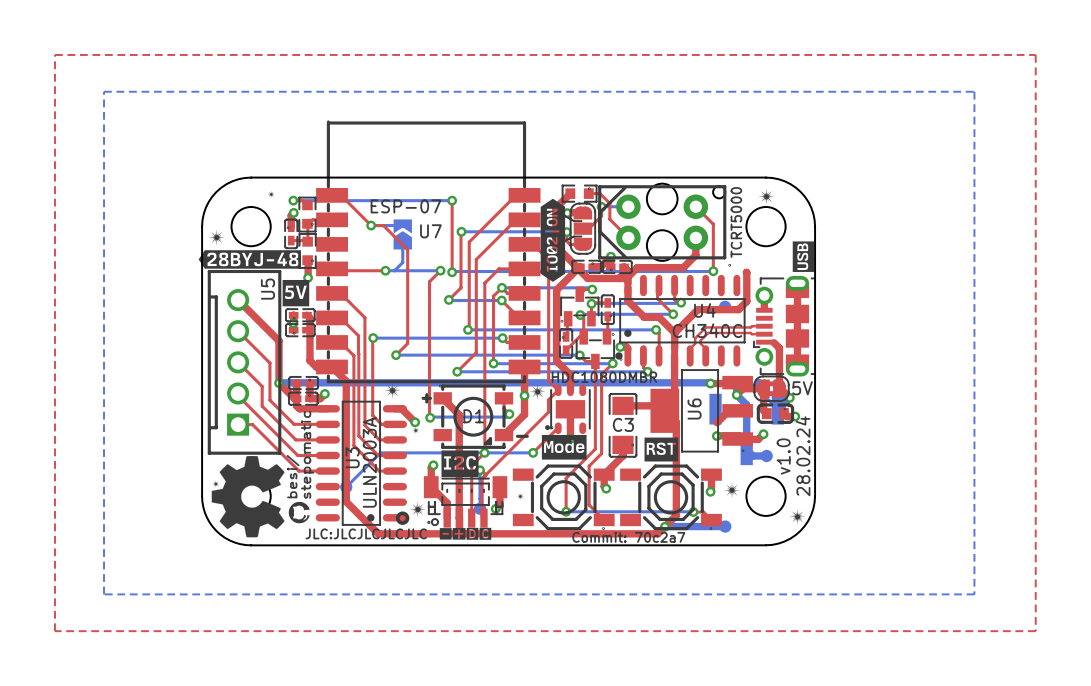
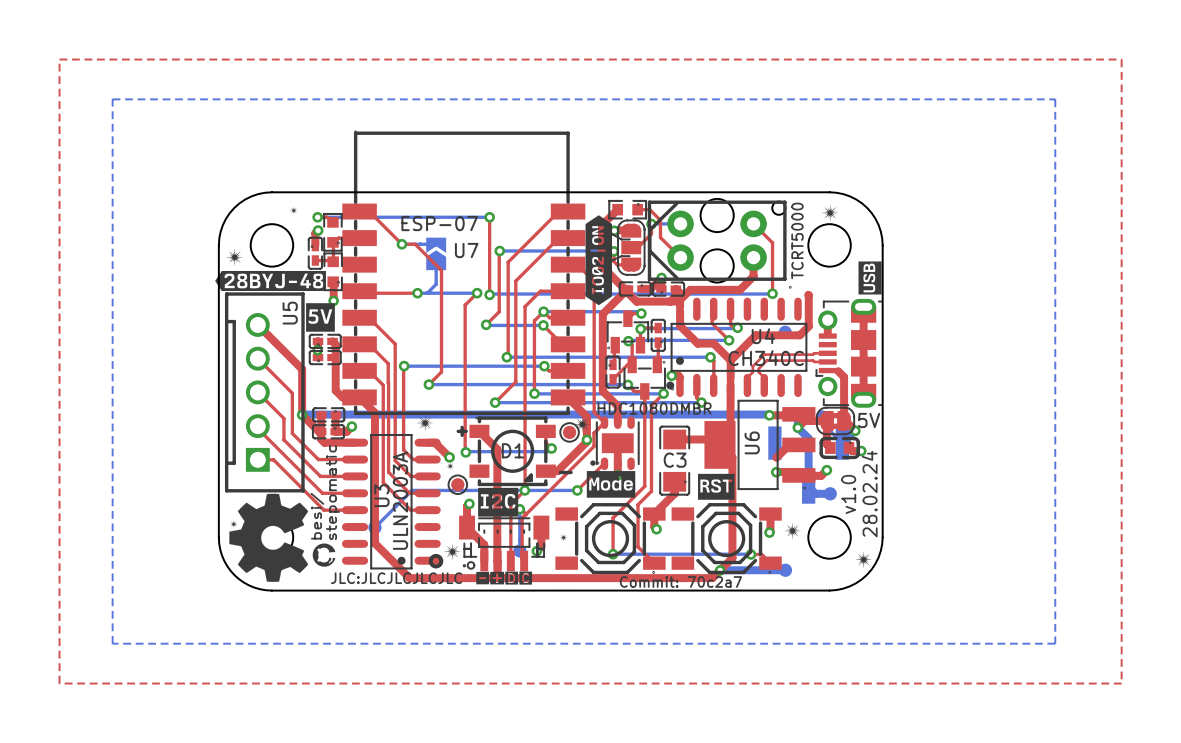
top track: (524, 367) (524, 414) (504, 435) -> (568, 397) (586, 416) (586, 441) (557, 471) (545, 471)
via position: (524, 395) -> (586, 439)
part: none -> (569, 432)
part: none -> (457, 484)

